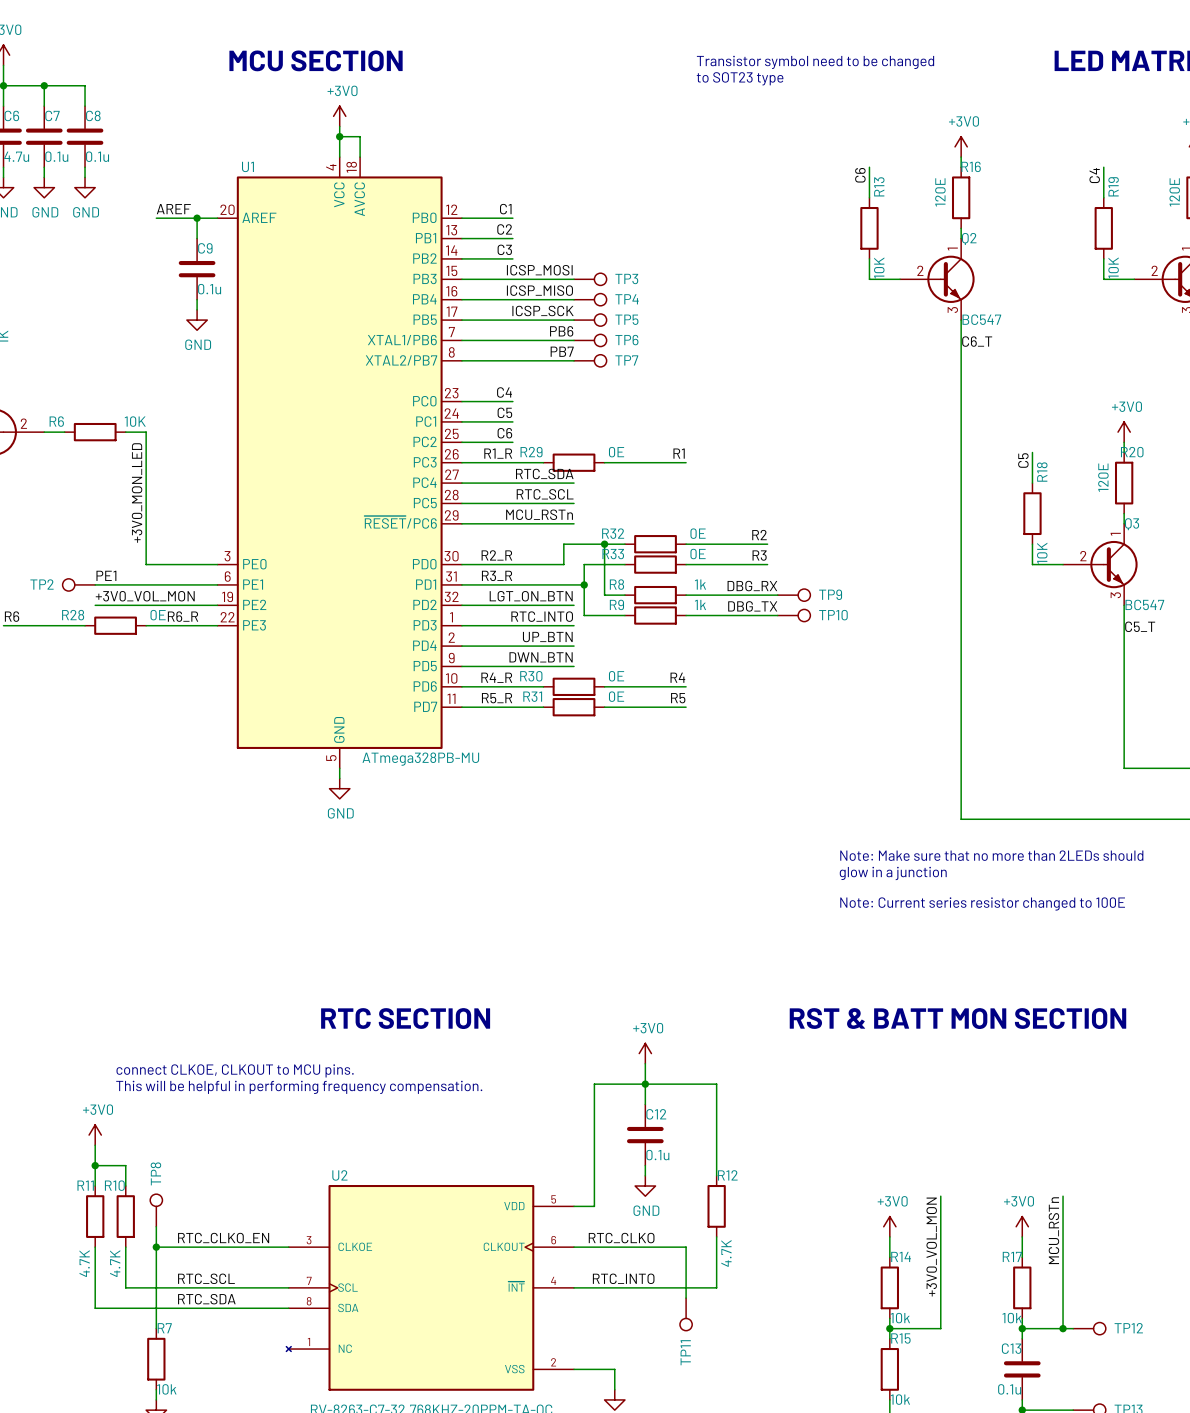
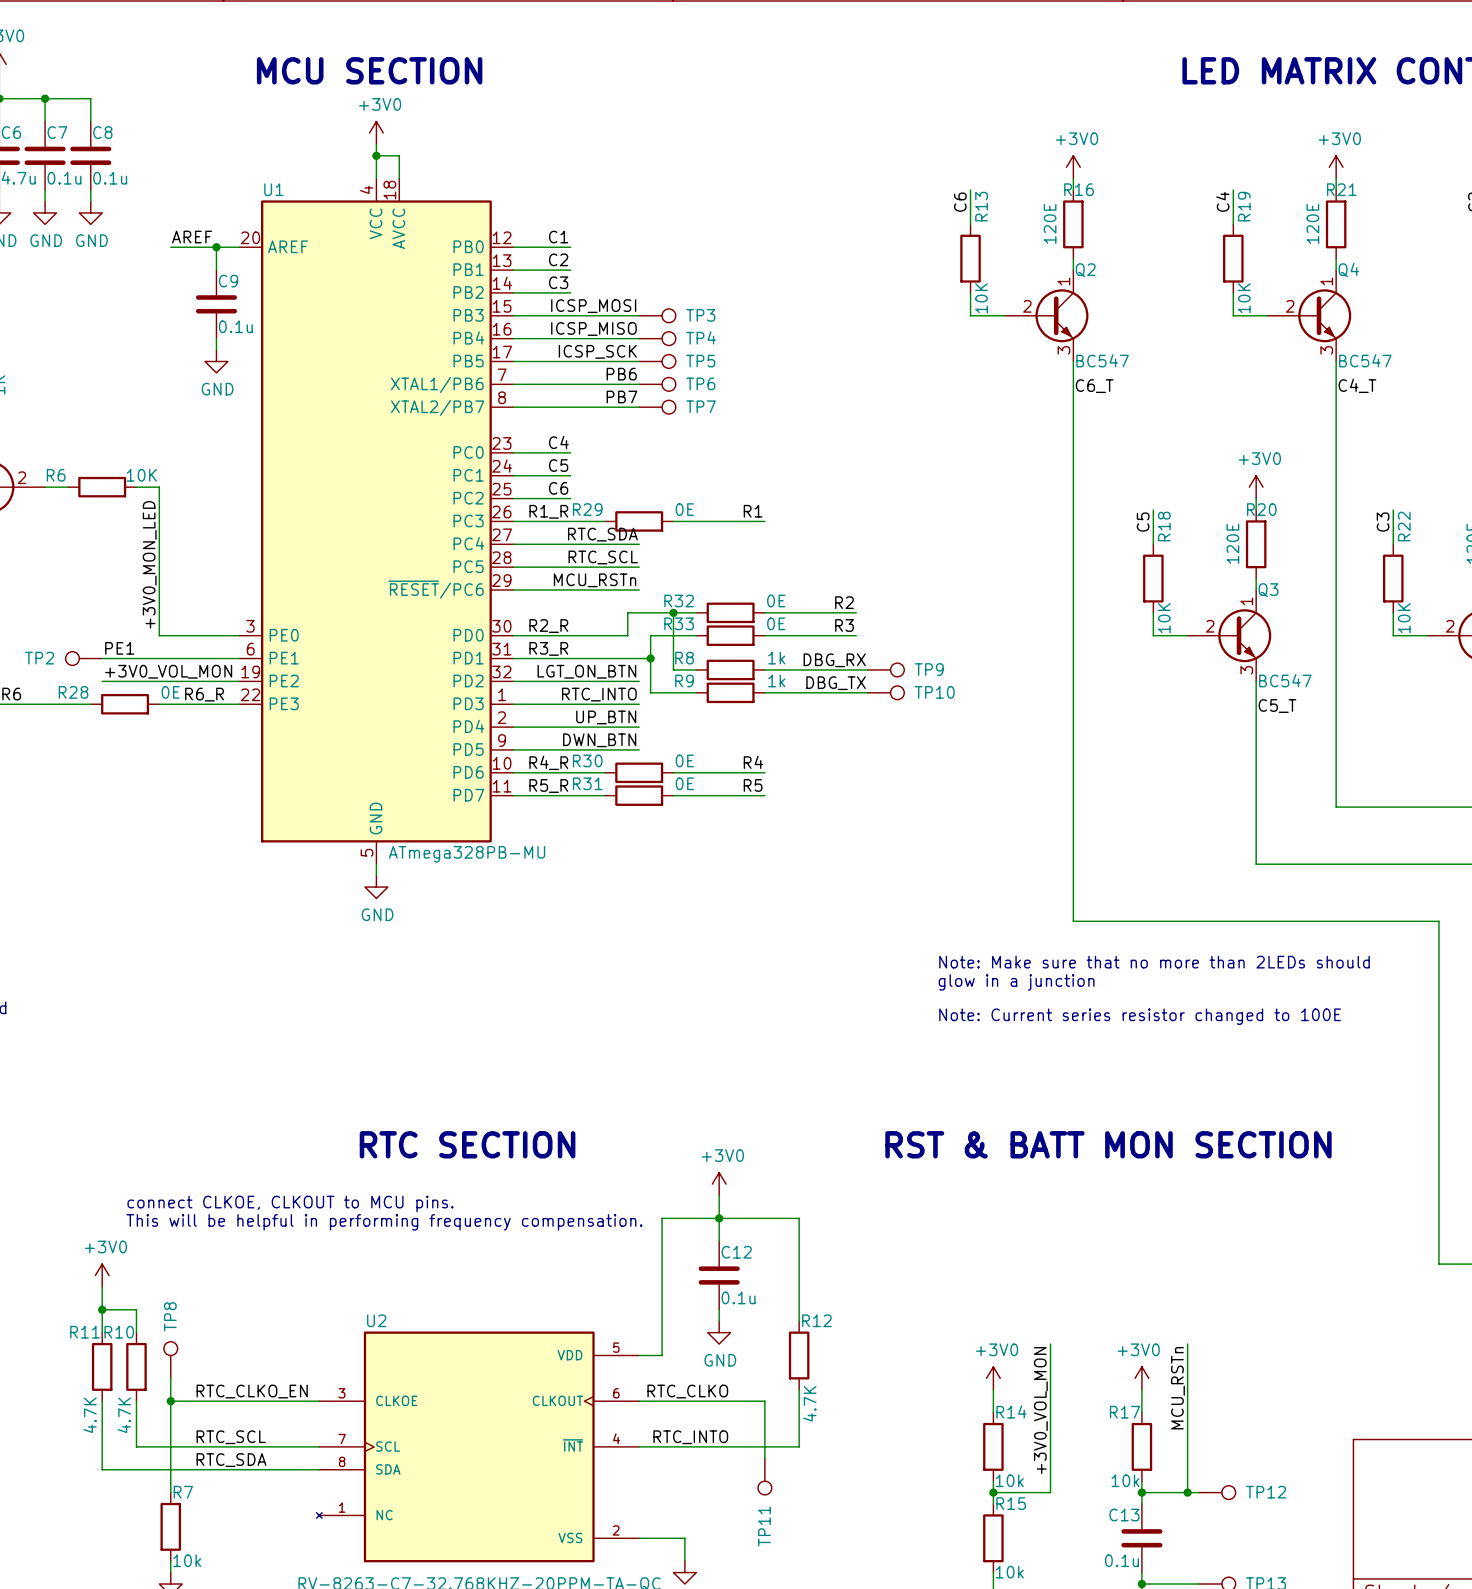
text: Transistor symbol need to be changed (815, 62) -> none
text: to SOT23 type (740, 78) -> none

